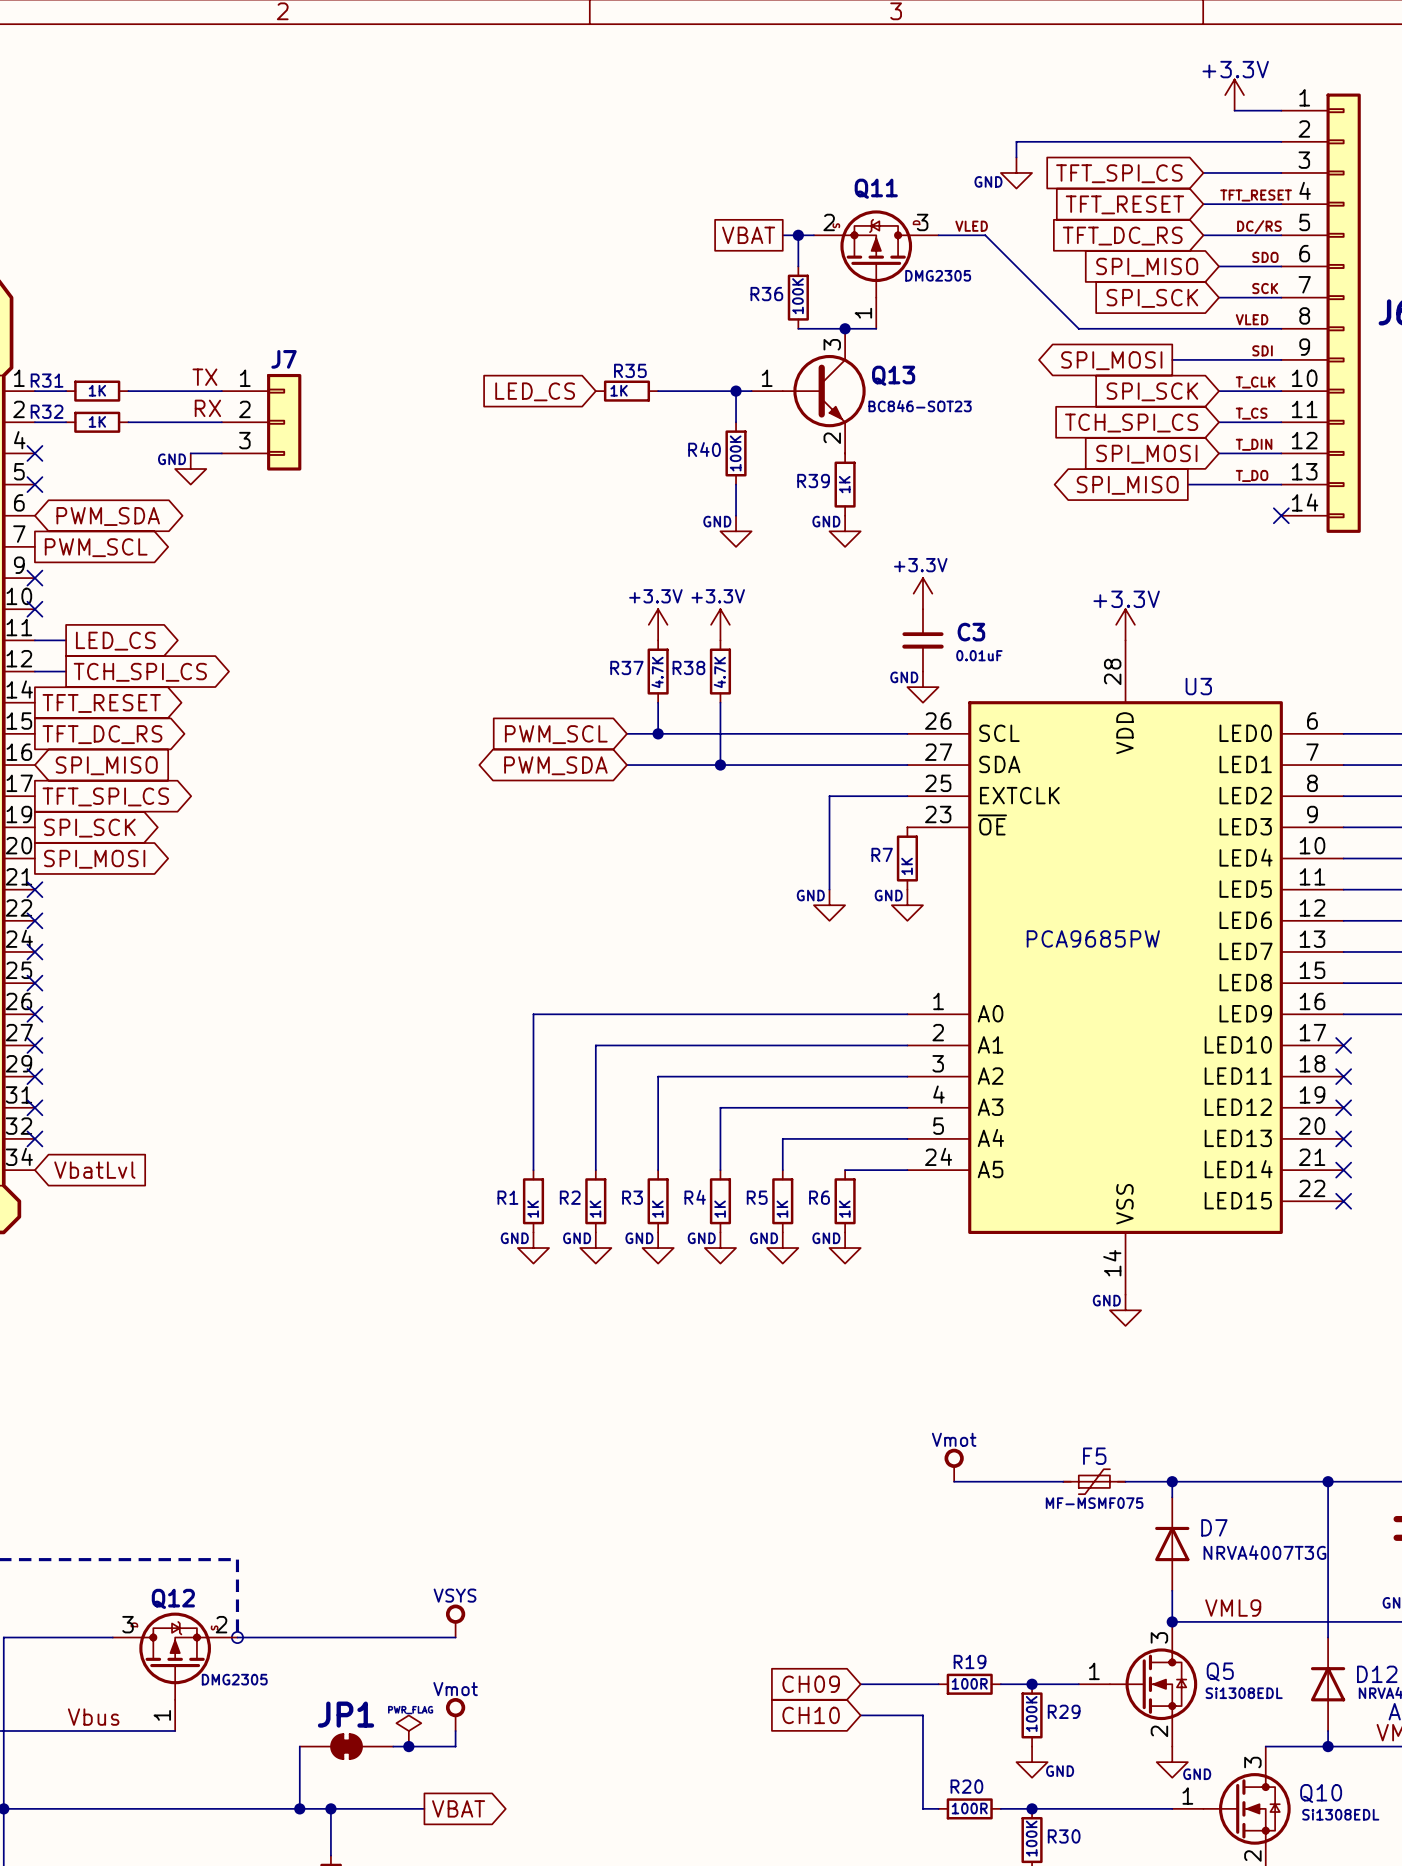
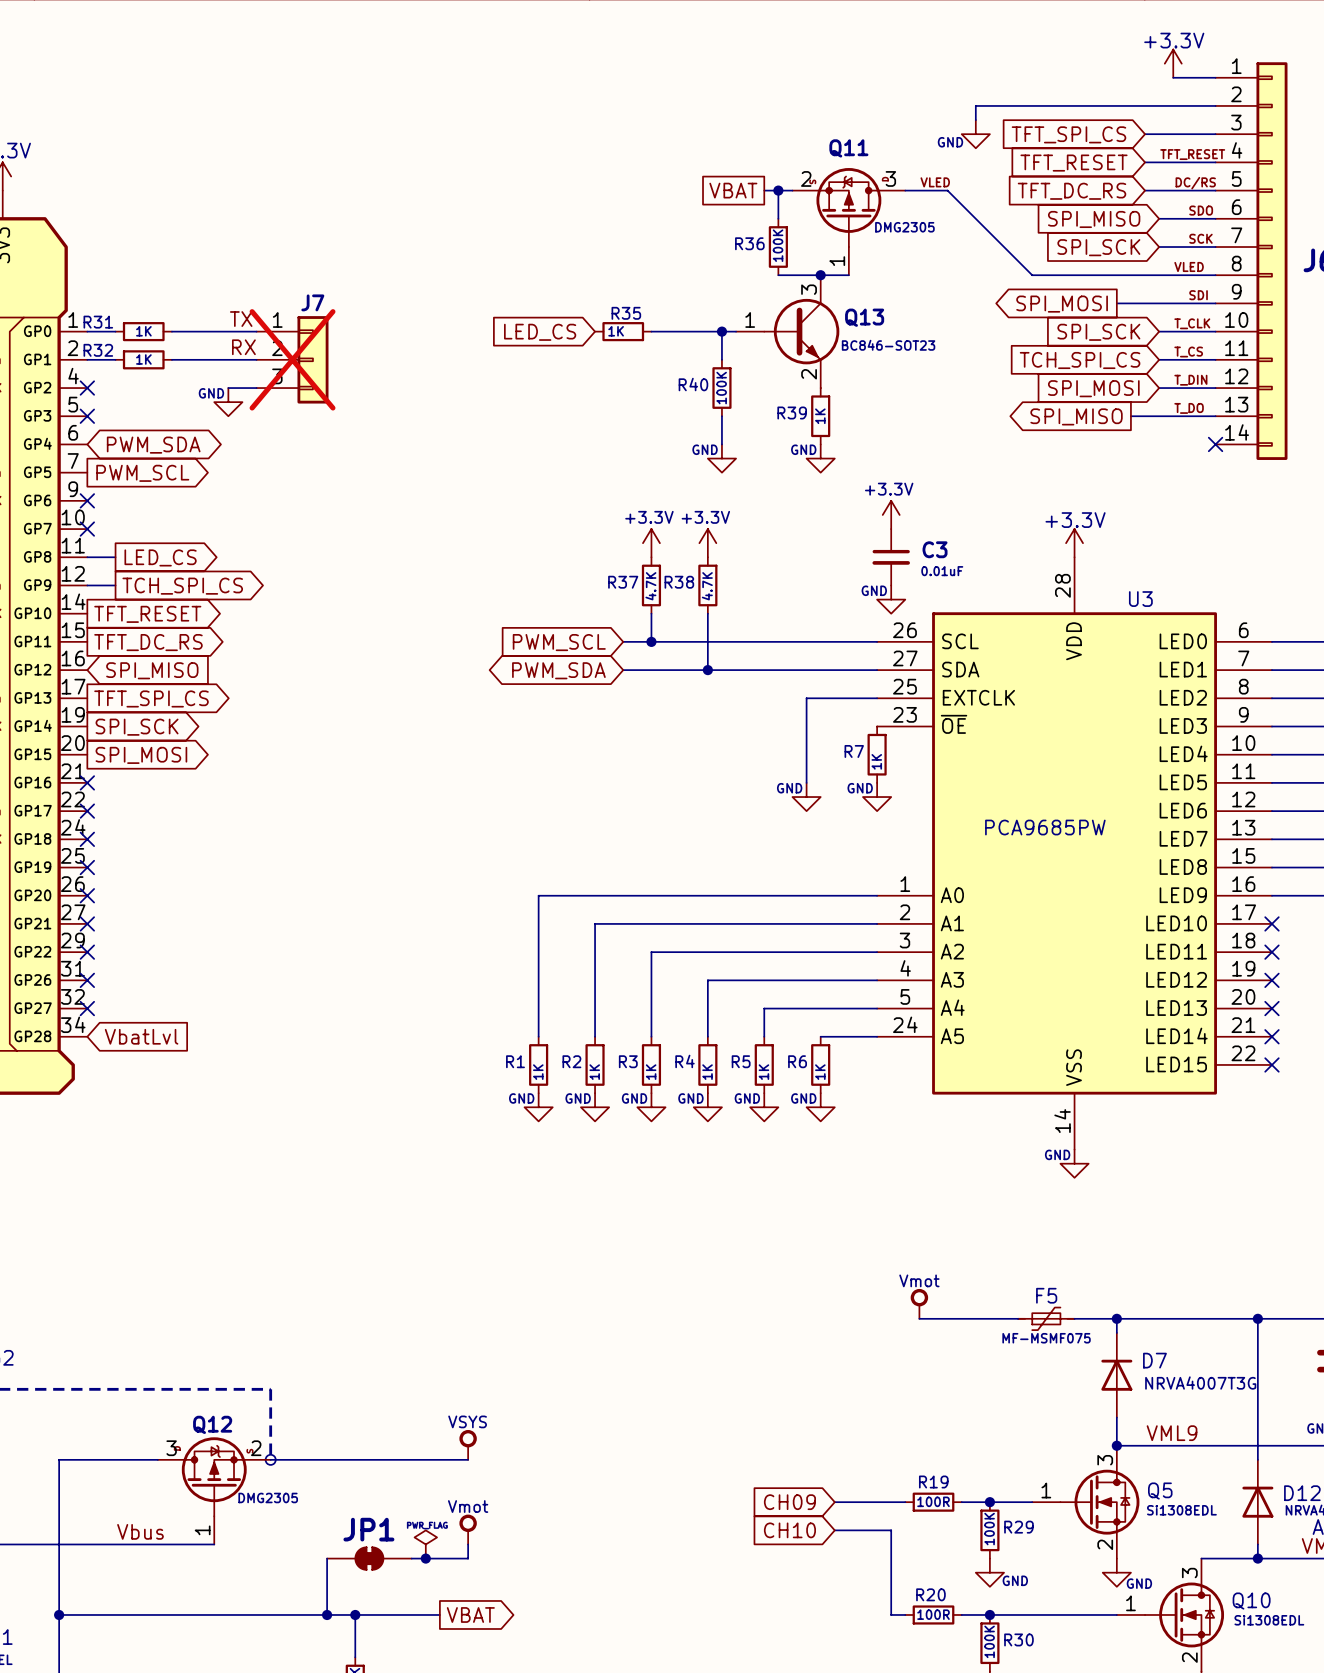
J7 do-not-place cross: none -> (292, 359)

